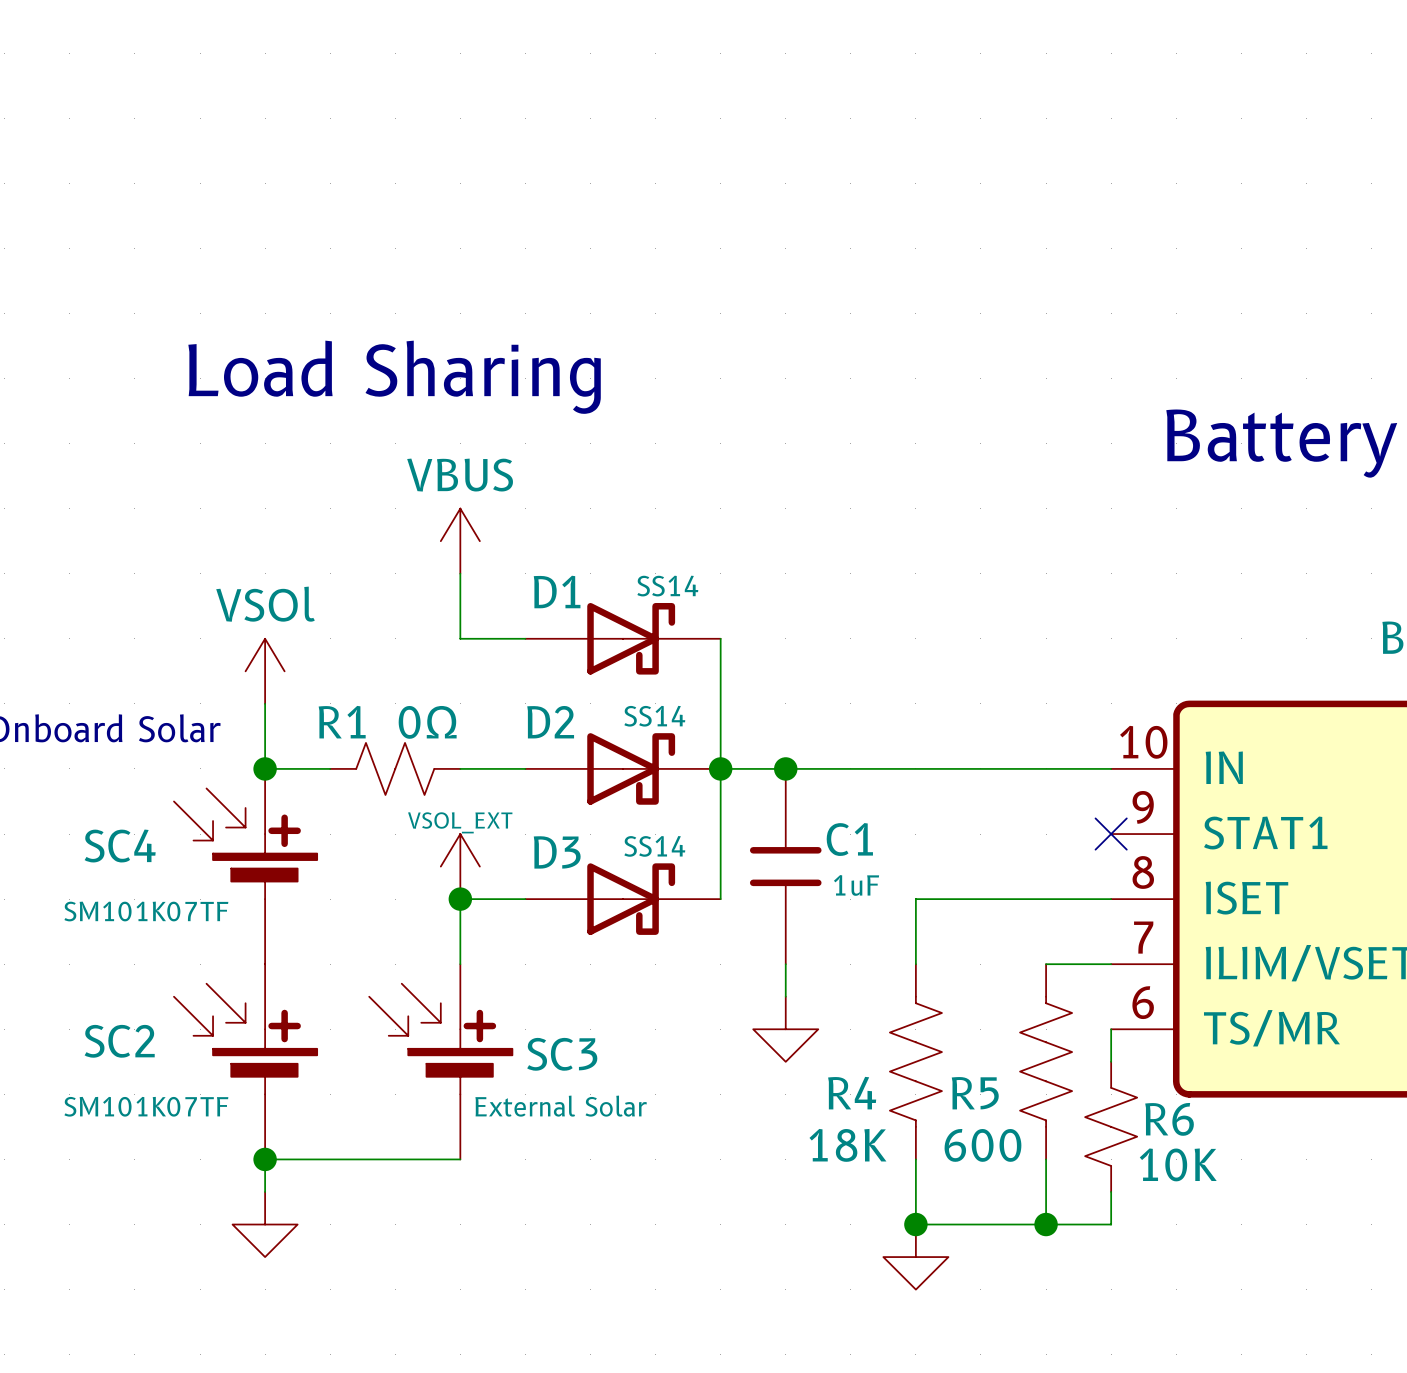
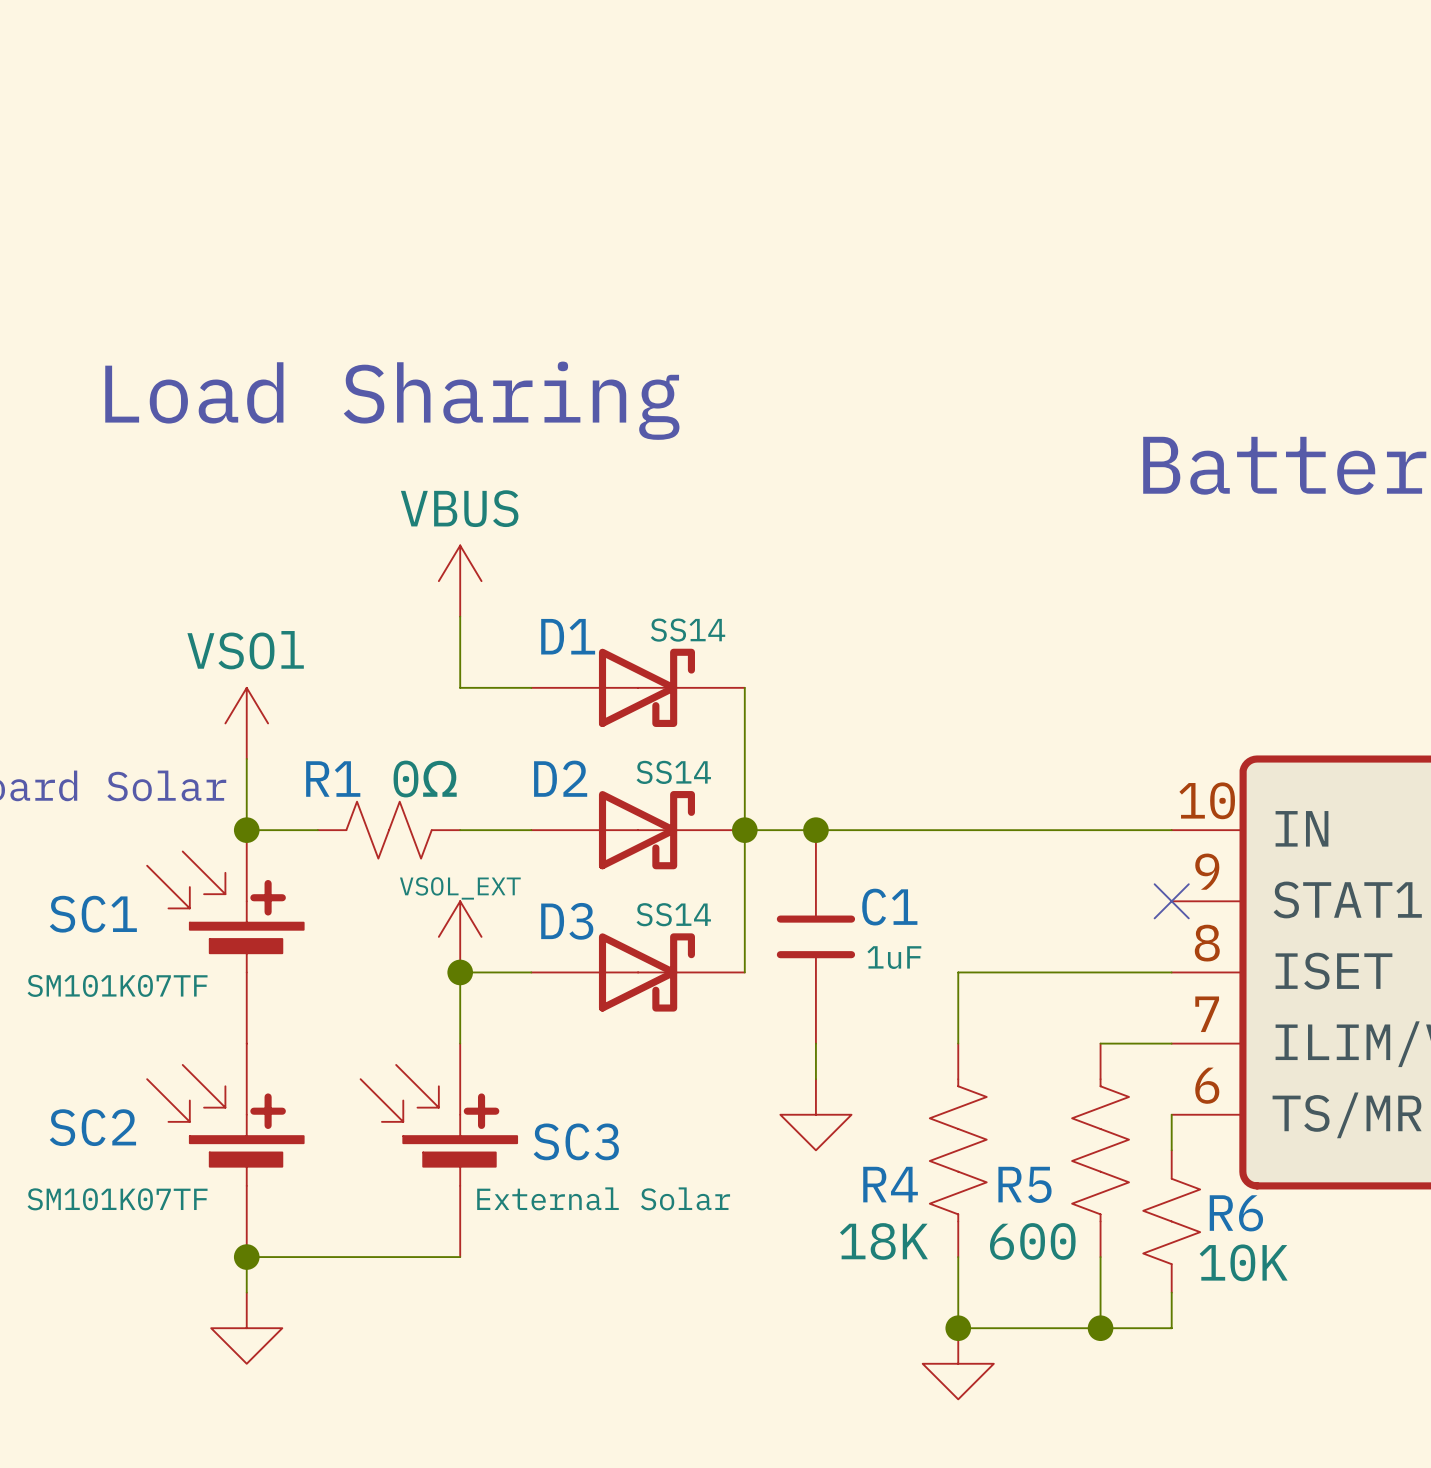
SC4 name: SC4 (120, 846) -> SC1 (93, 914)

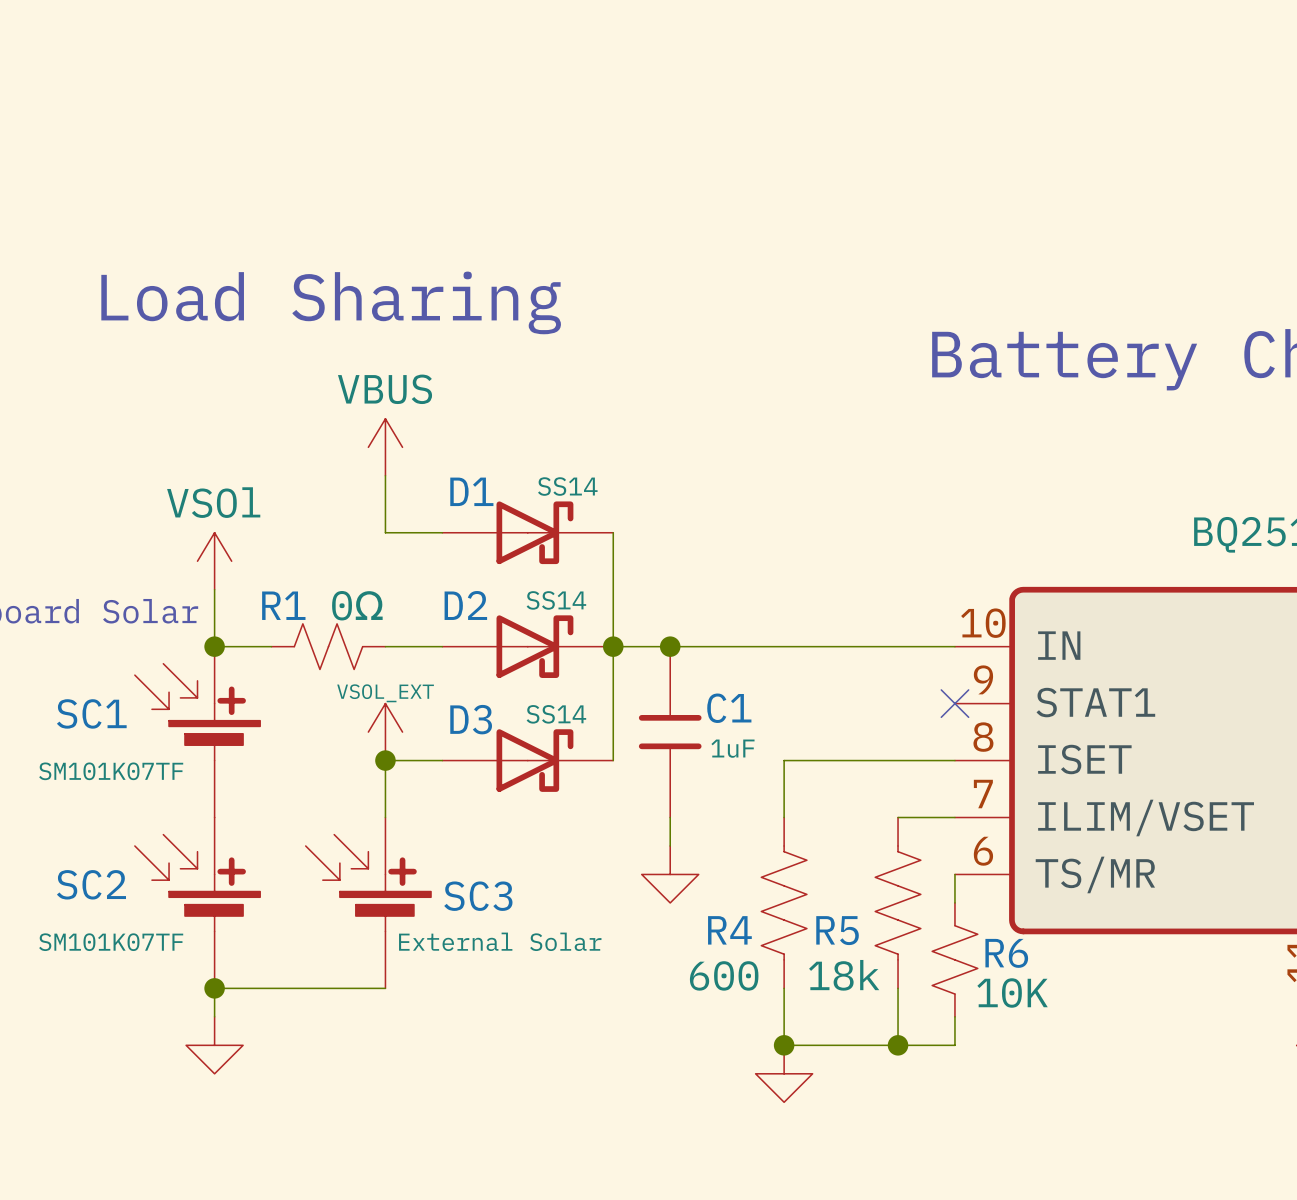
R4 value: 18K (883, 1241) -> 600 (724, 975)
R5 value: 600 (1032, 1241) -> 18k (844, 975)

